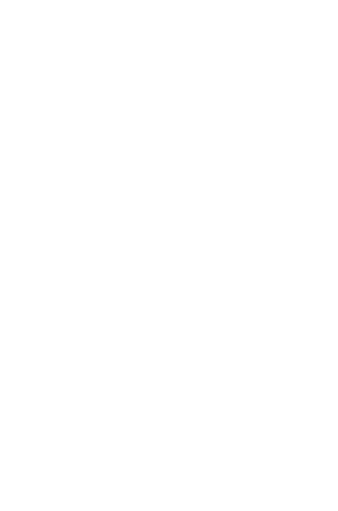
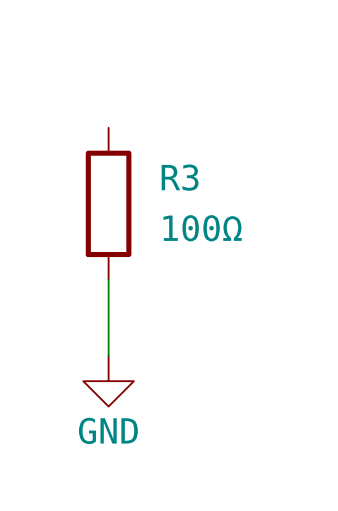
R3: none -> 100Ω (108, 203)
wire: none -> (108, 279) (108, 355)
power symbol: none -> GND (108, 381)

